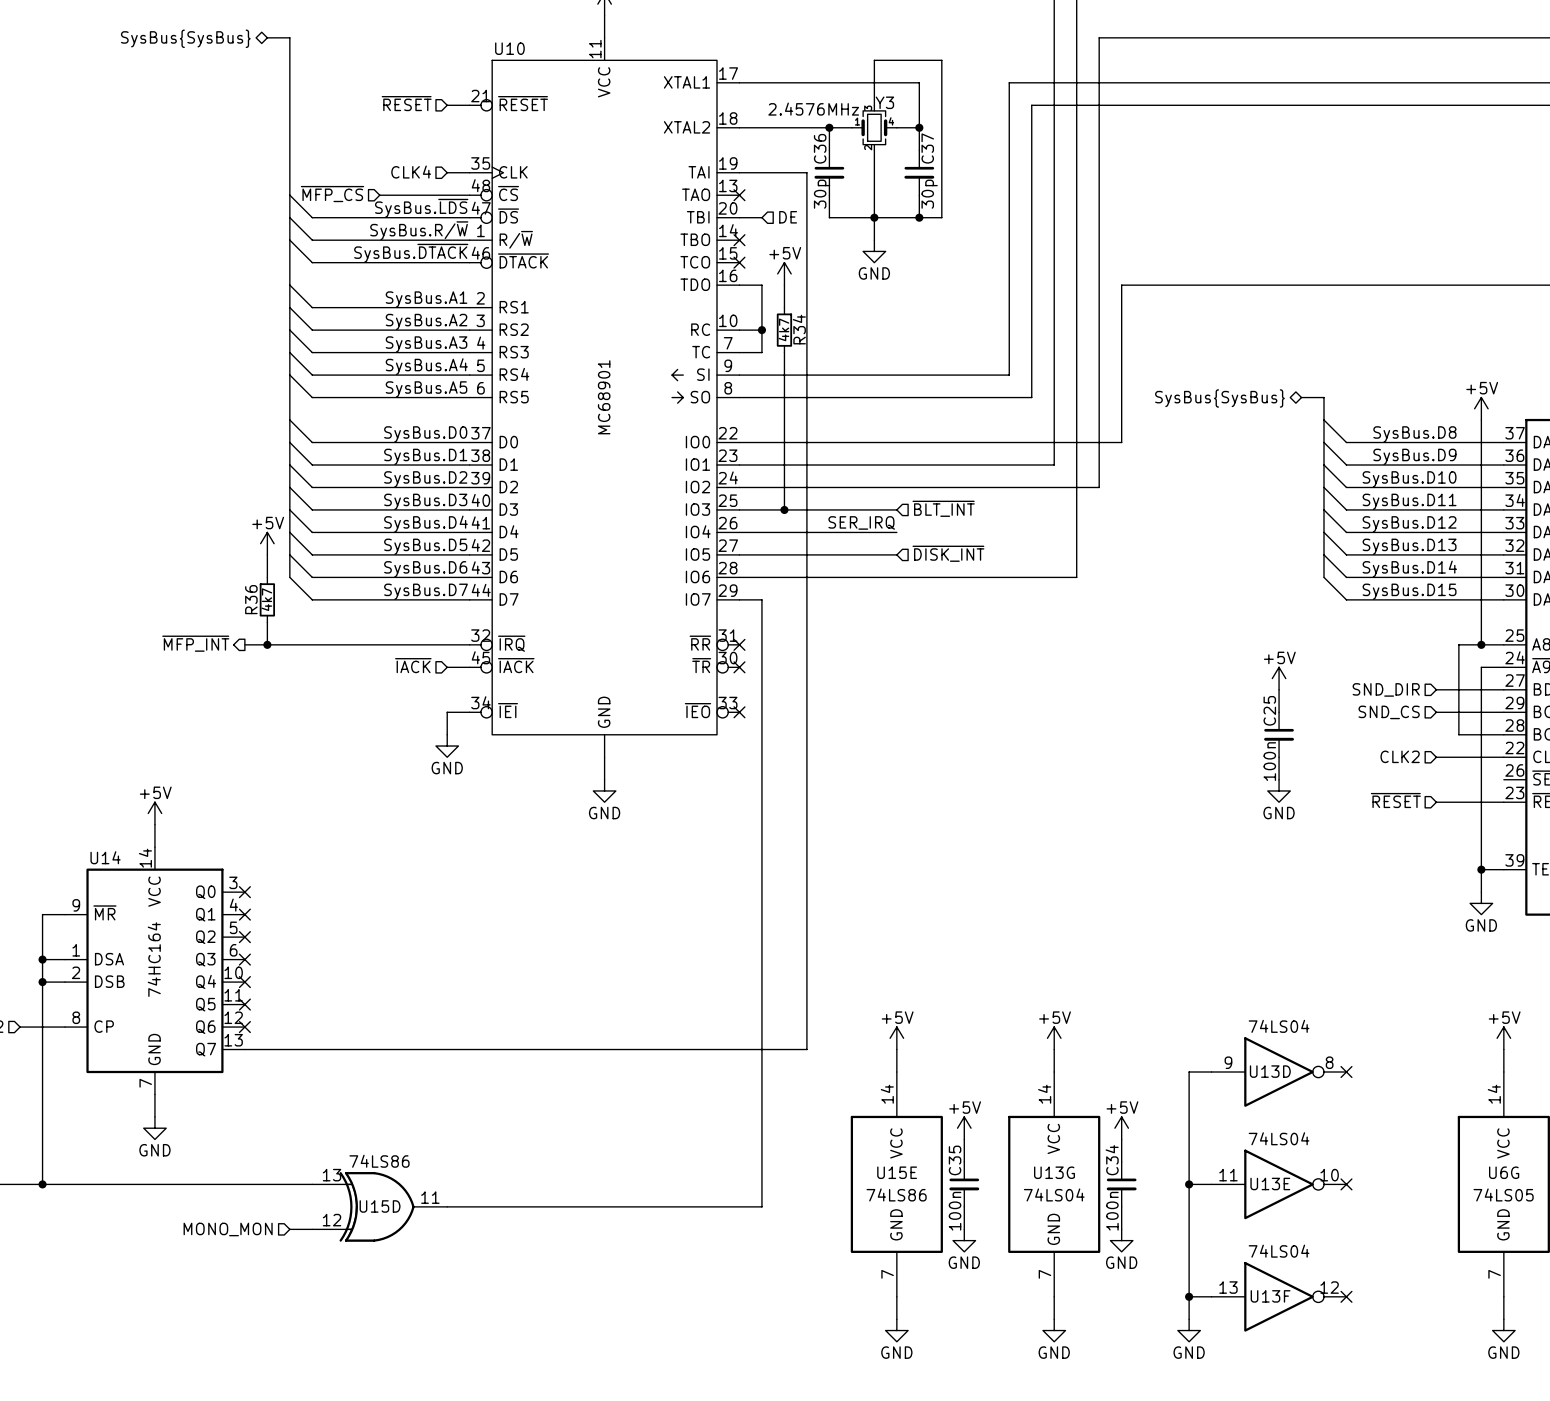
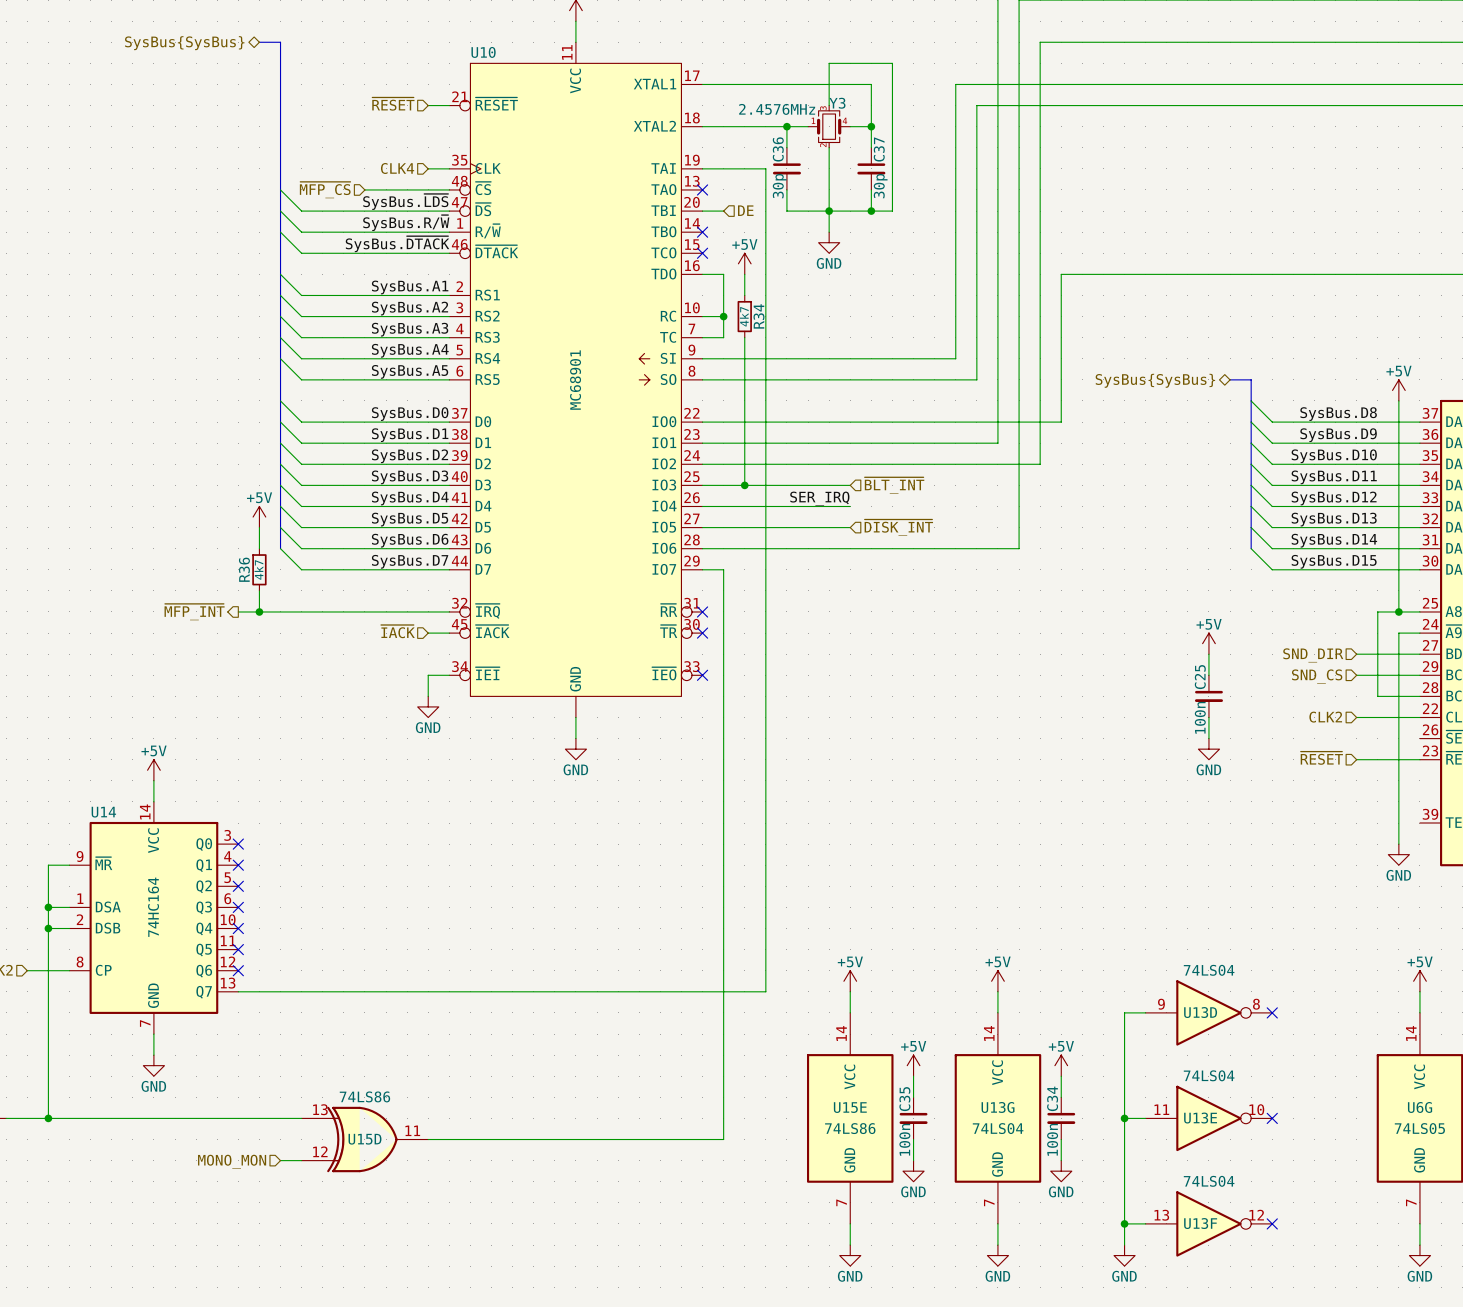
wire: (1481, 869) (1503, 869) -> none
junction: (1481, 869) -> none

